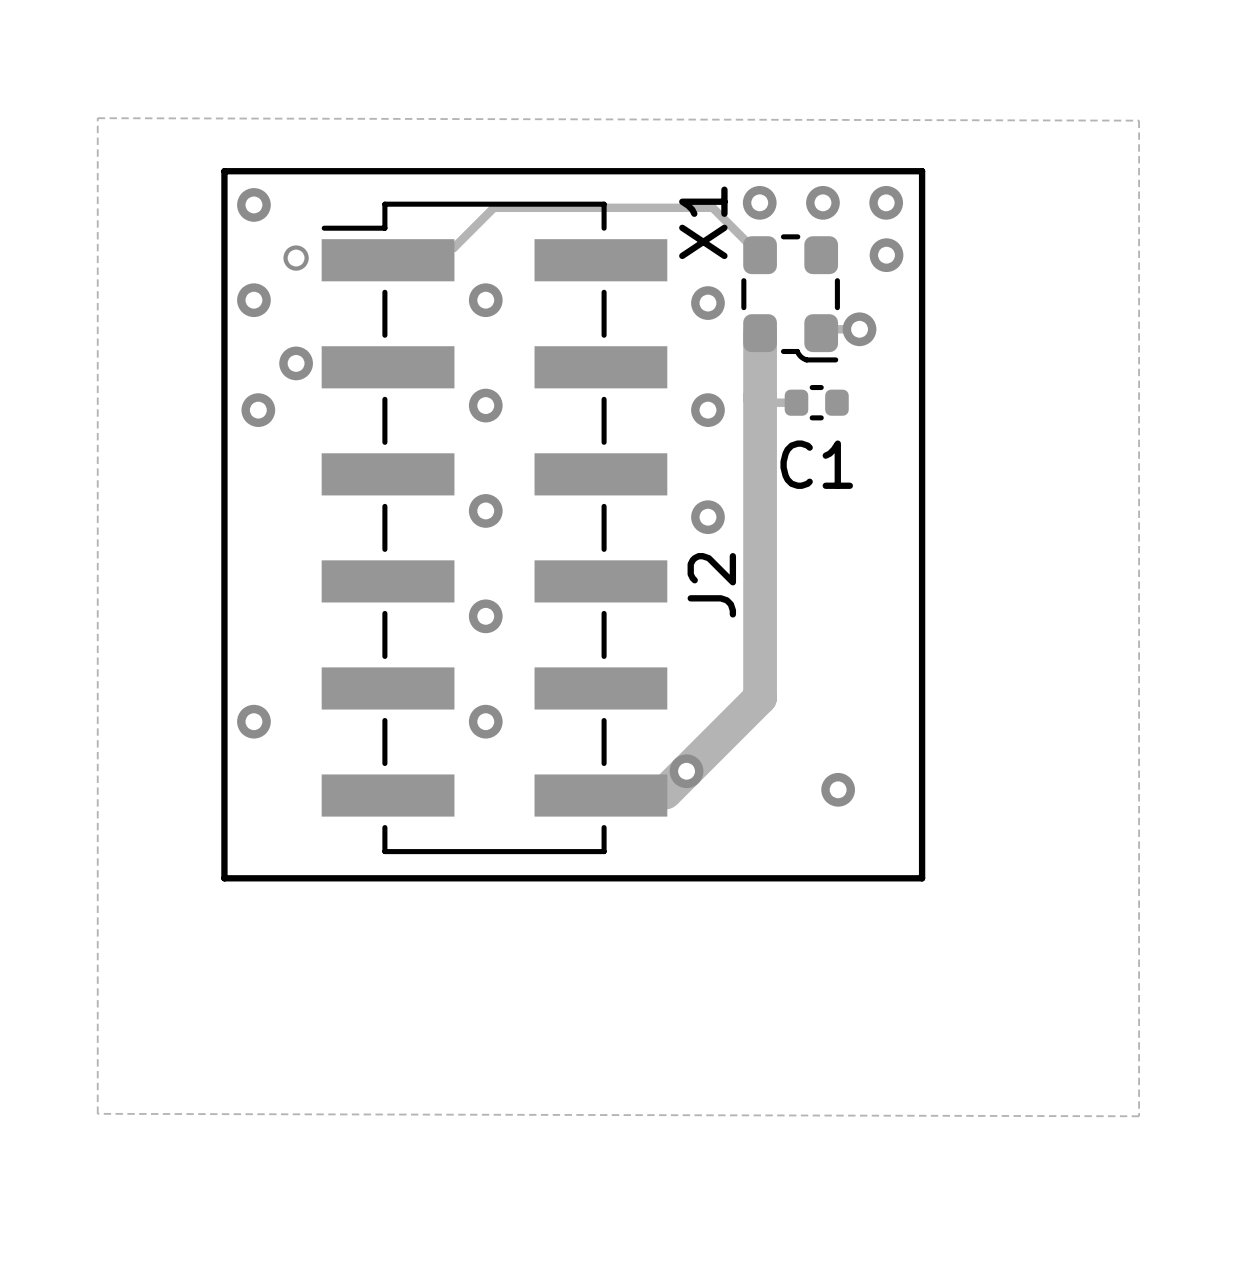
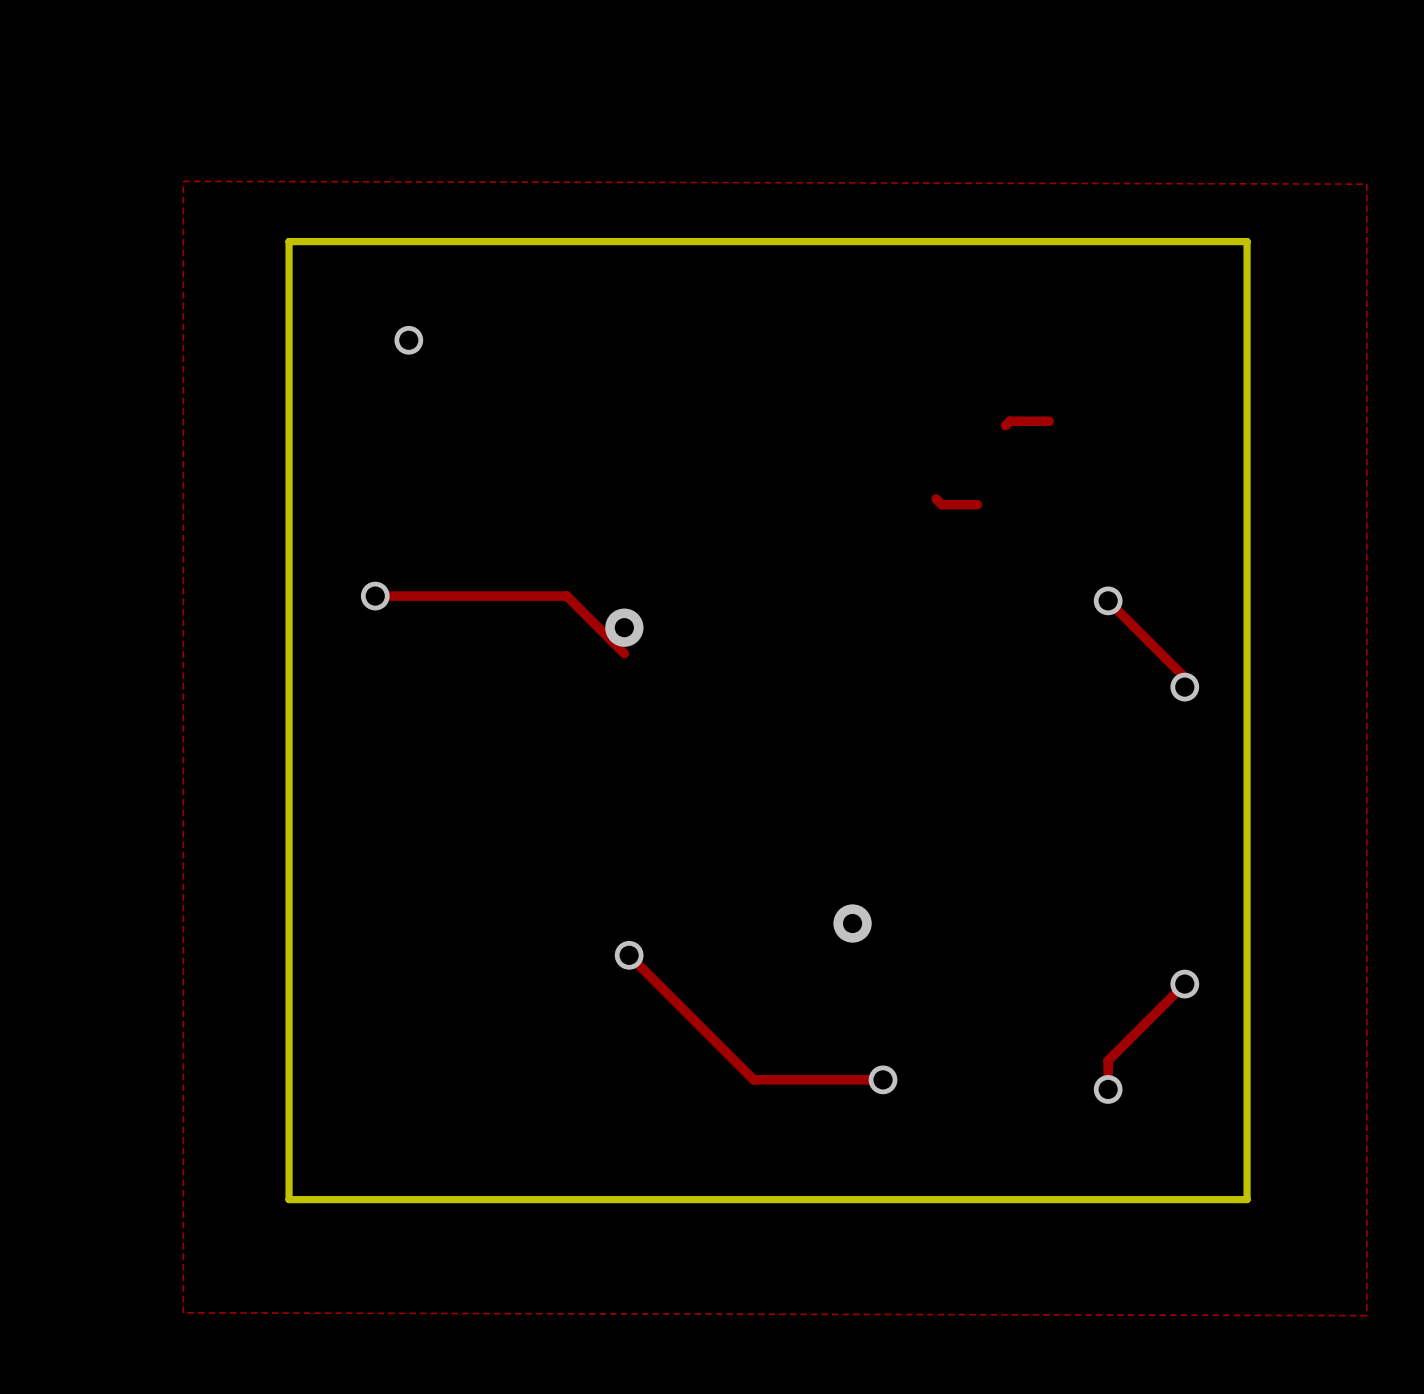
board edge: (224, 171) (224, 878) (922, 878) (922, 171) -> (327, 241) (289, 241) (289, 1199) (1247, 1199) (1247, 241) (1120, 241)
via: (759, 202) -> none
via: (822, 202) -> none
via: (886, 202) -> none
via: (253, 204) -> none
track: (378, 247) (453, 247) (493, 207) (712, 207) (760, 255) -> none
via: (886, 255) -> none
X1: (790, 298) -> none
via: (253, 300) -> none
via: (485, 300) -> none
via: (707, 303) -> none
via: (859, 329) -> none
track: (760, 333) (760, 697) (665, 792) -> none
via: (296, 363) -> none
C1: (816, 402) -> none
via: (485, 405) -> none
via: (258, 410) -> none
via: (707, 410) -> none
track: none -> (375, 596) (566, 596) (624, 653)
via: none -> (375, 596)
track: none -> (1108, 600) (1184, 677) (1184, 687)
via: none -> (1108, 600)
via: (707, 517) -> none
J2: (494, 527) -> none
via: none -> (1184, 687)
via: (485, 616) -> none
via: (253, 721) -> none
via: (485, 721) -> none
via: (838, 789) -> none
track: none -> (629, 955) (753, 1079) (883, 1079)
via: none -> (629, 955)
track: none -> (1184, 984) (1108, 1060) (1108, 1089)
via: none -> (1184, 984)
via: none -> (883, 1079)
via: none -> (1108, 1089)

